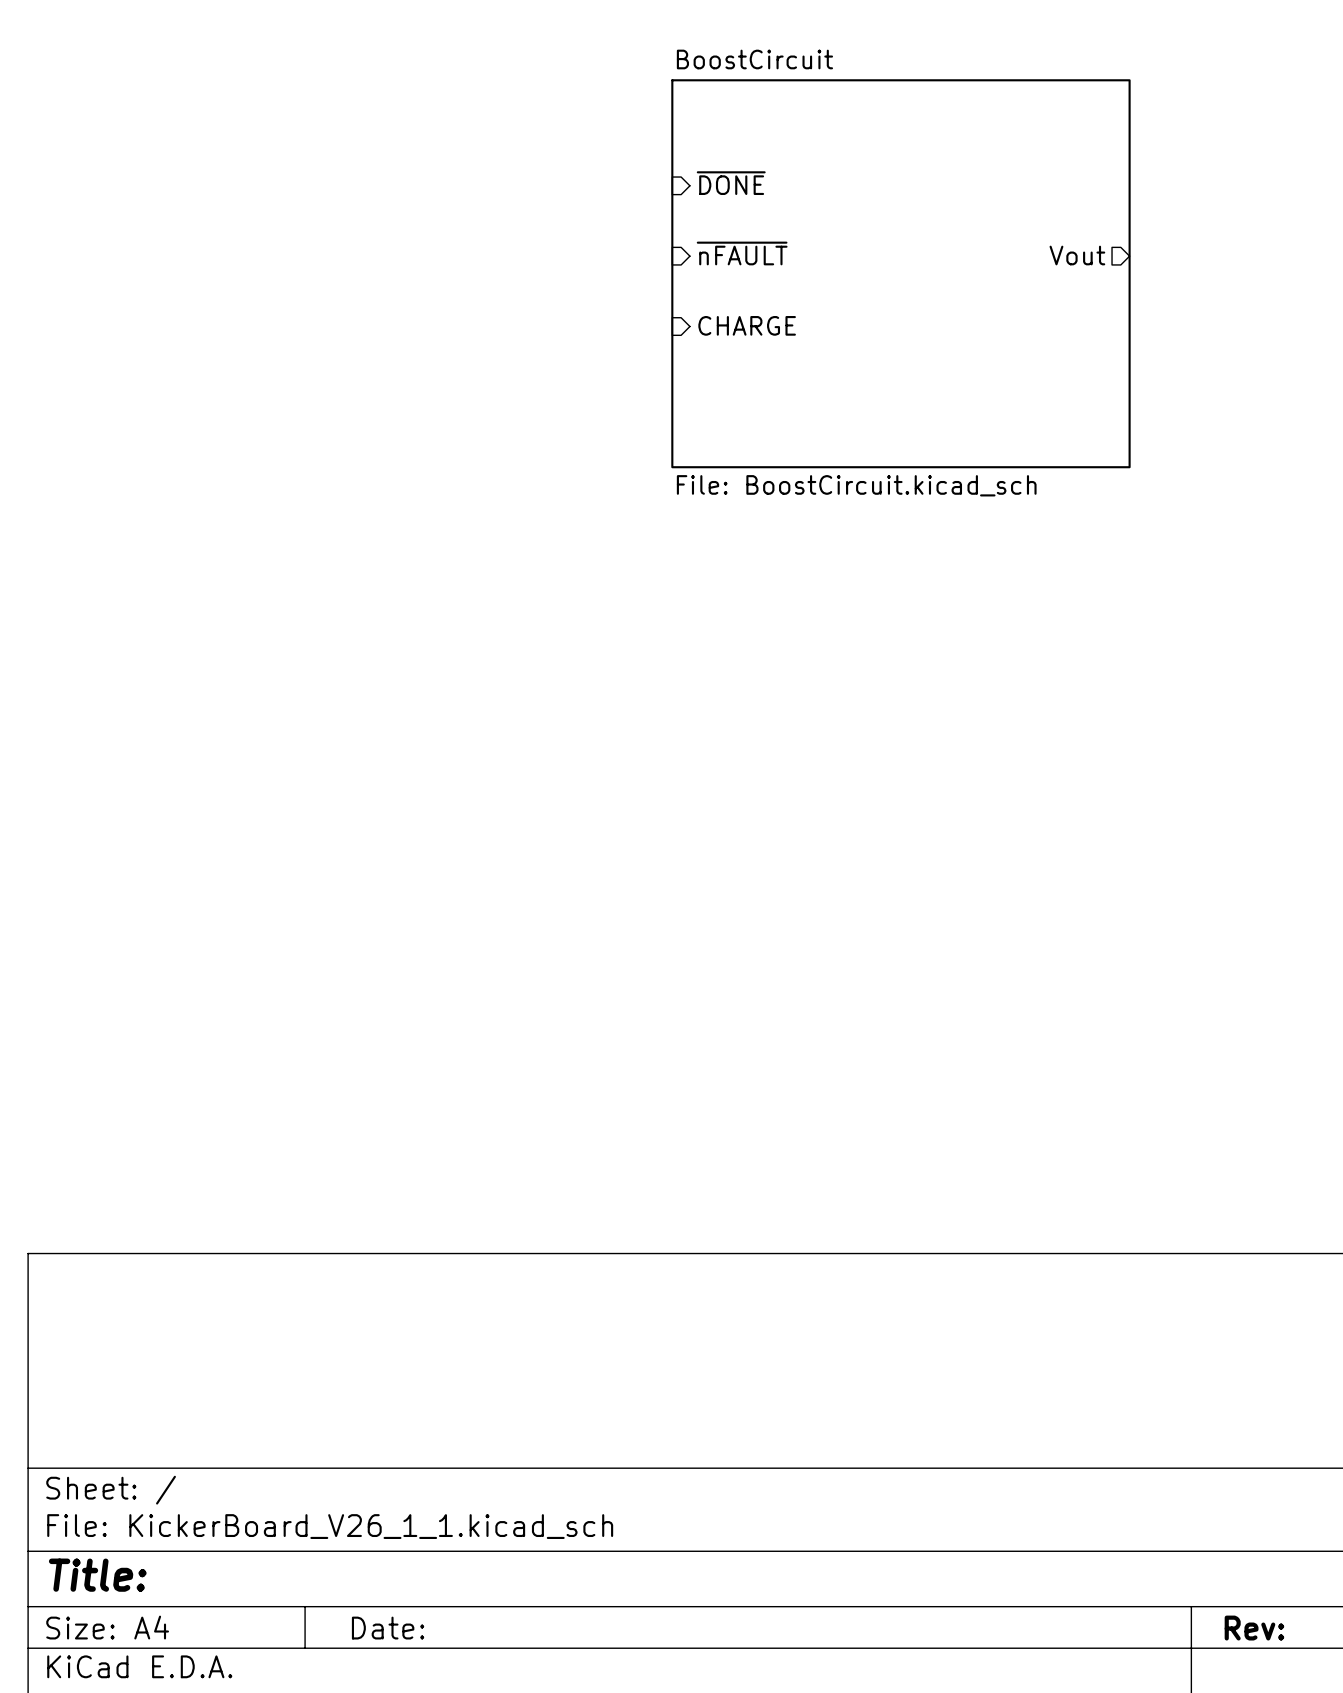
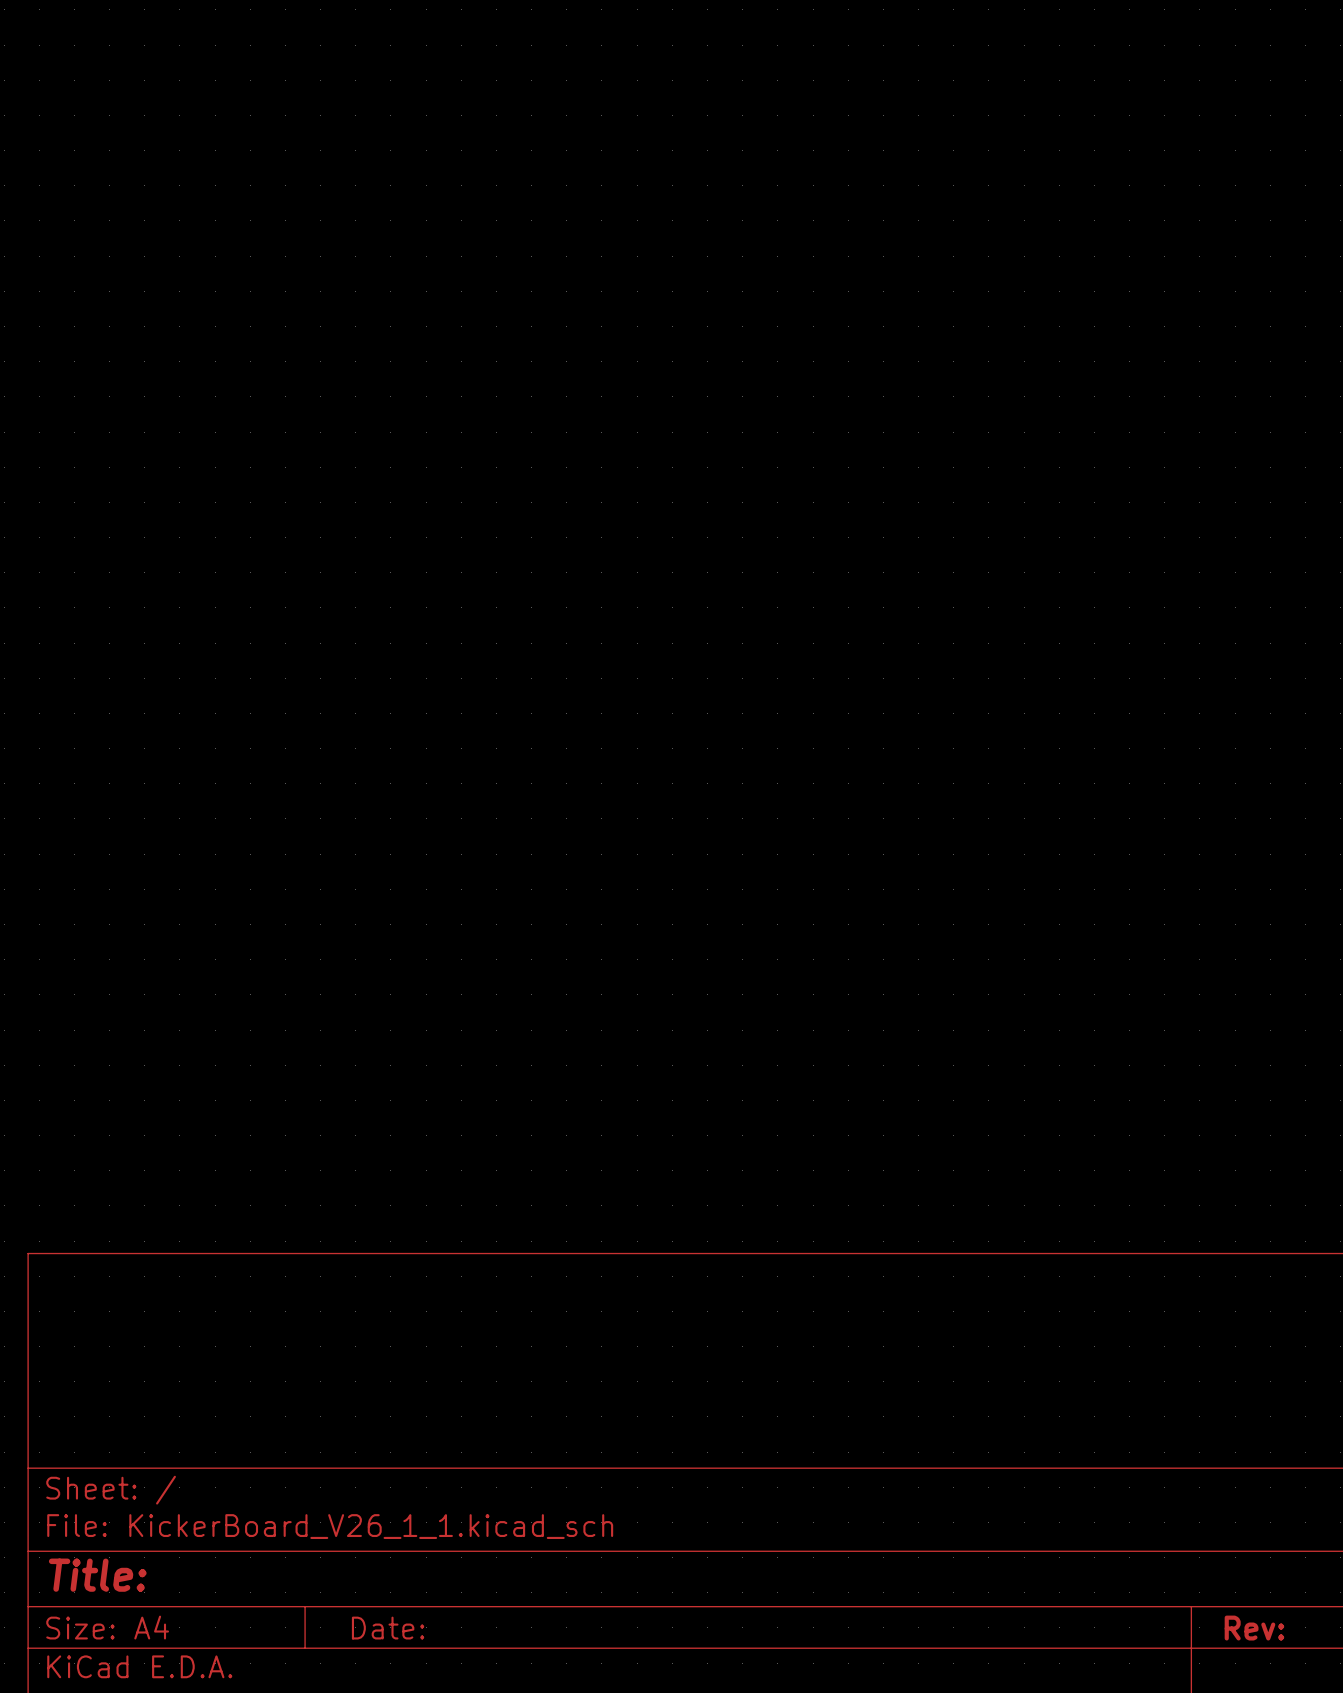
hierarchical label: ~{DONE} (731, 183) -> none
hierarchical label: ~{nFAULT} (742, 253) -> none
hierarchical label: Vout (1077, 255) -> none
sheet BoostCircuit: File: BoostCircuit.kicad_sch (900, 273) -> none
hierarchical label: CHARGE (747, 325) -> none

